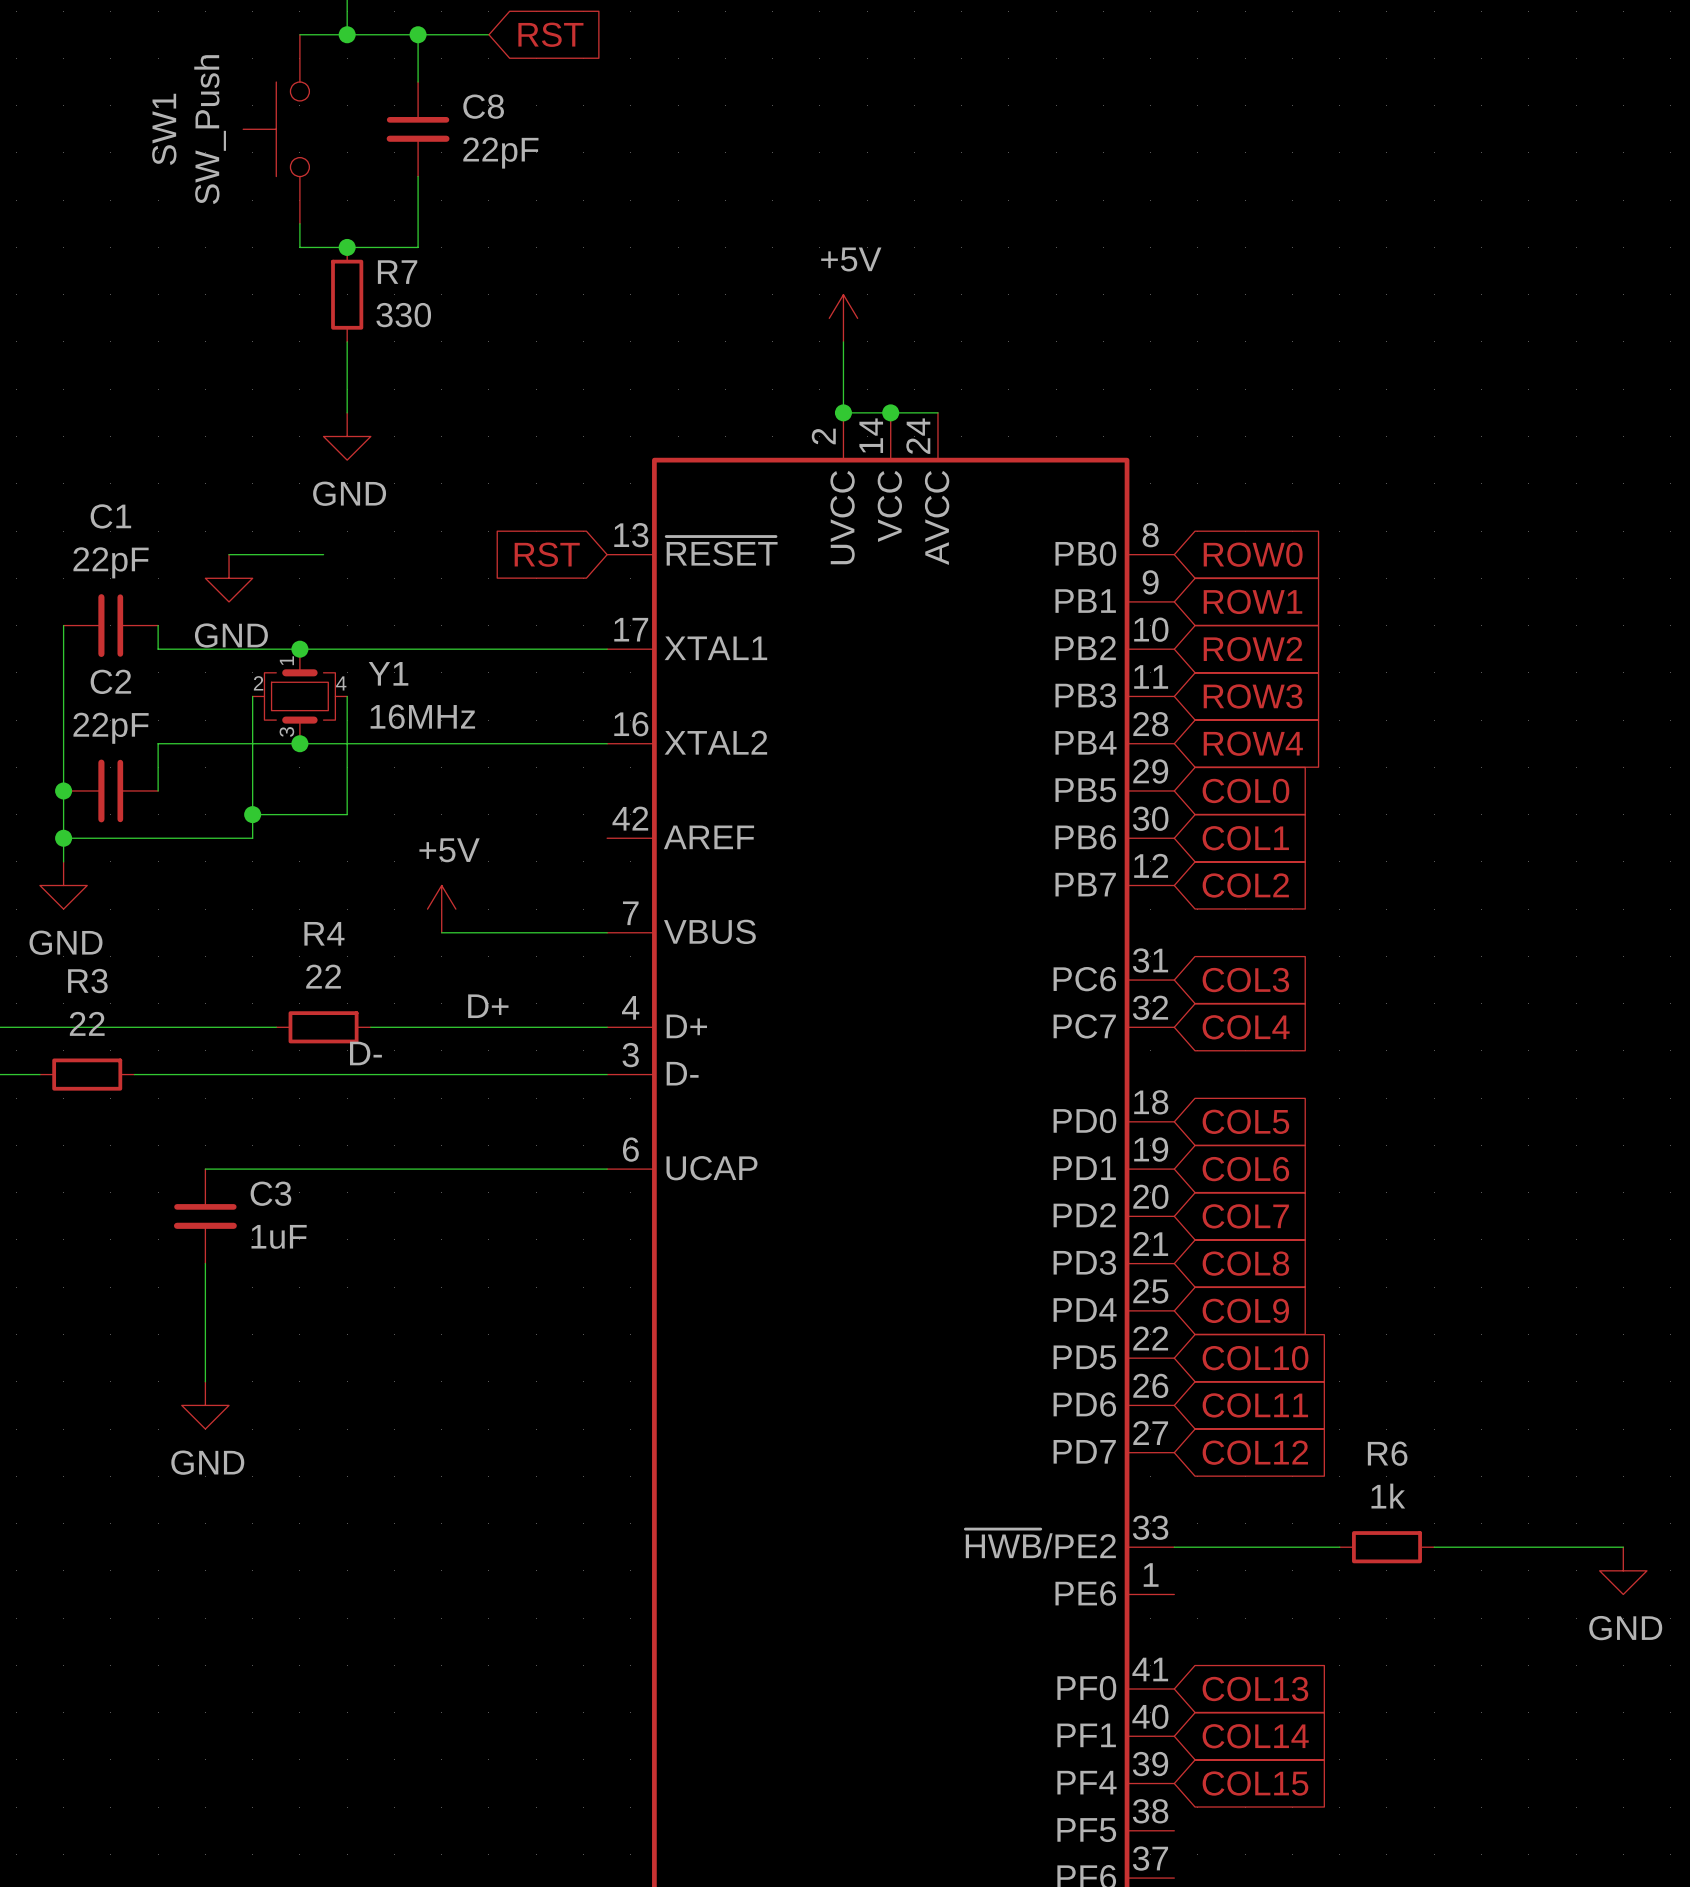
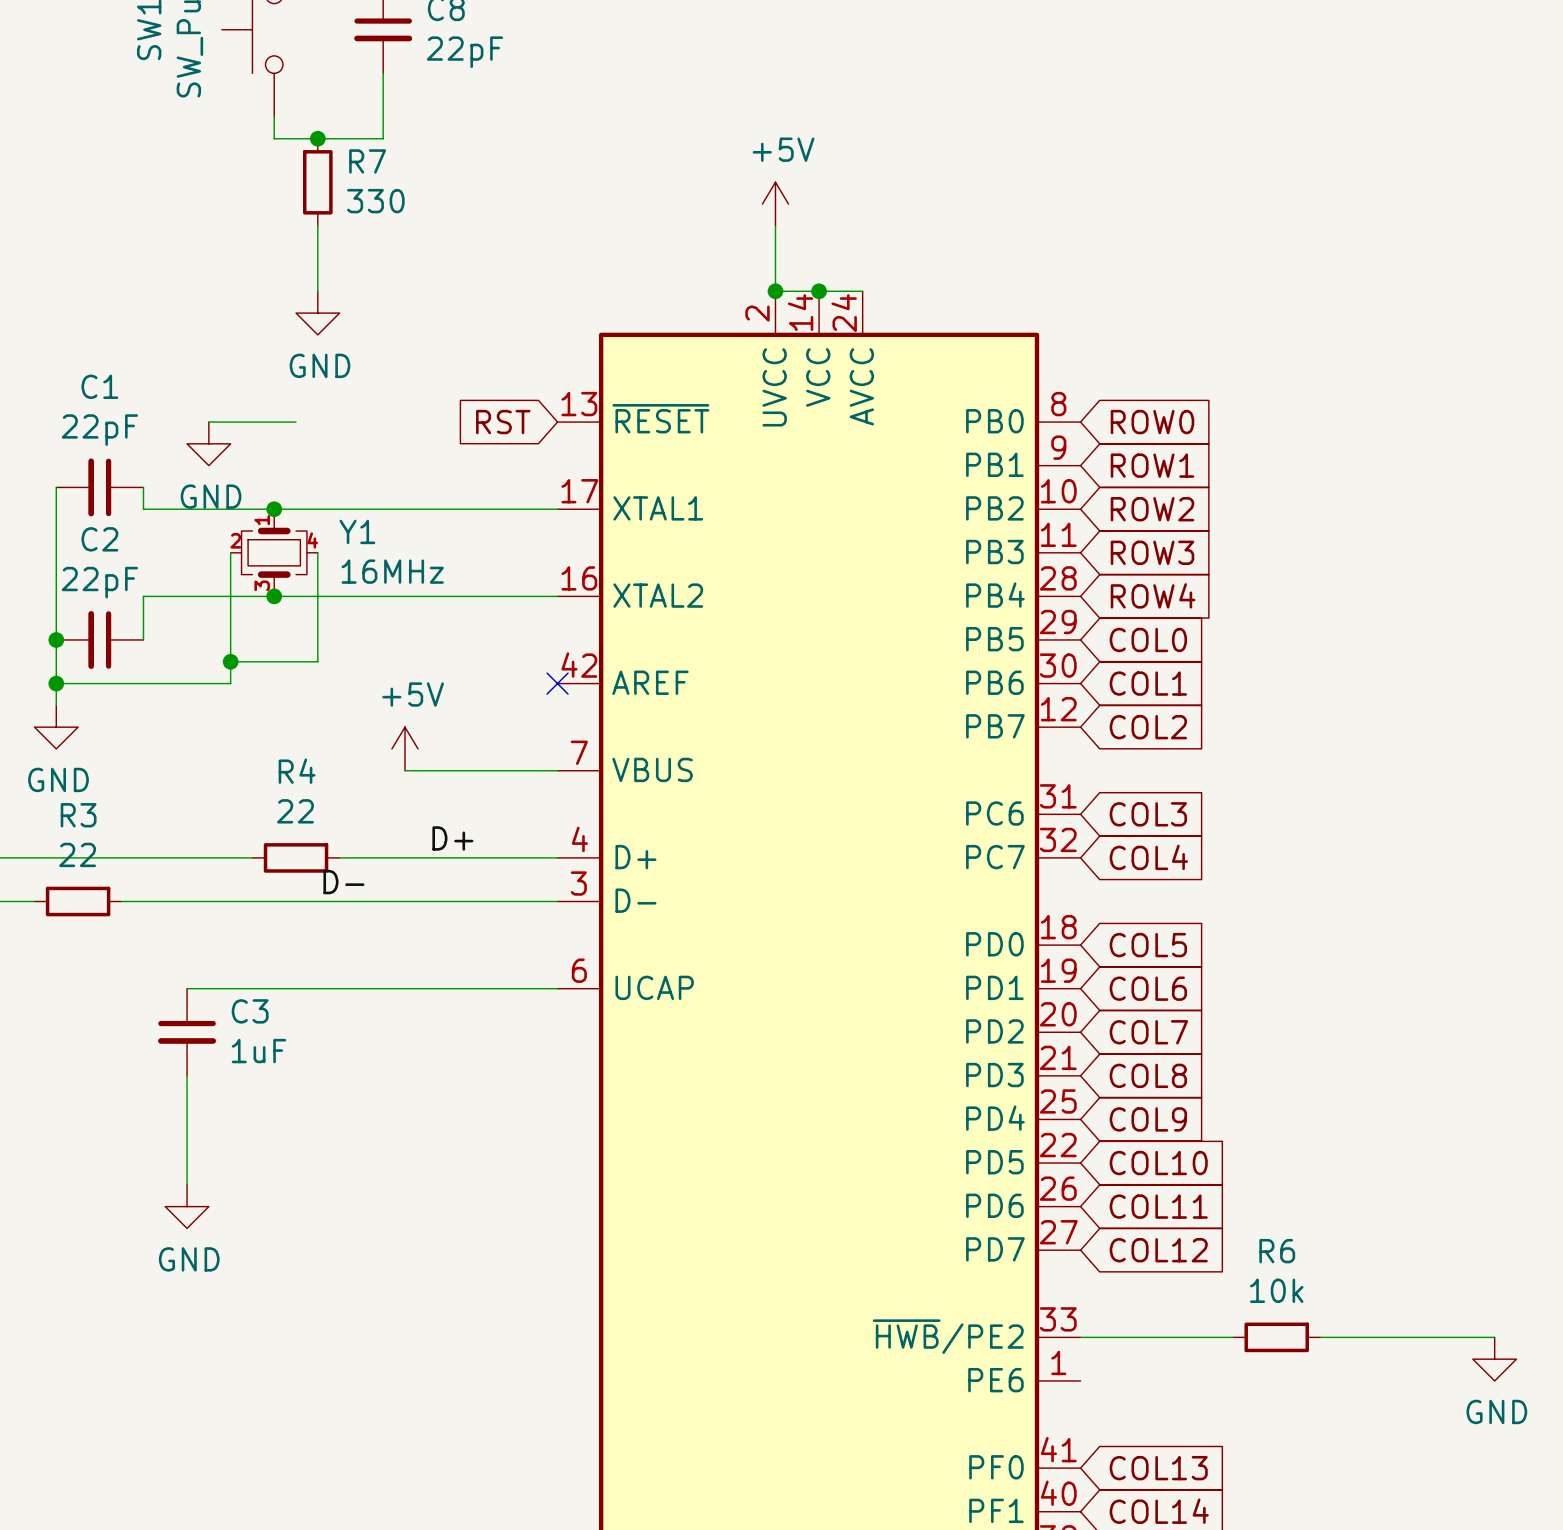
no-connect mark: none -> (557, 683)
R6 value: 1k (1388, 1496) -> 10k (1276, 1290)

